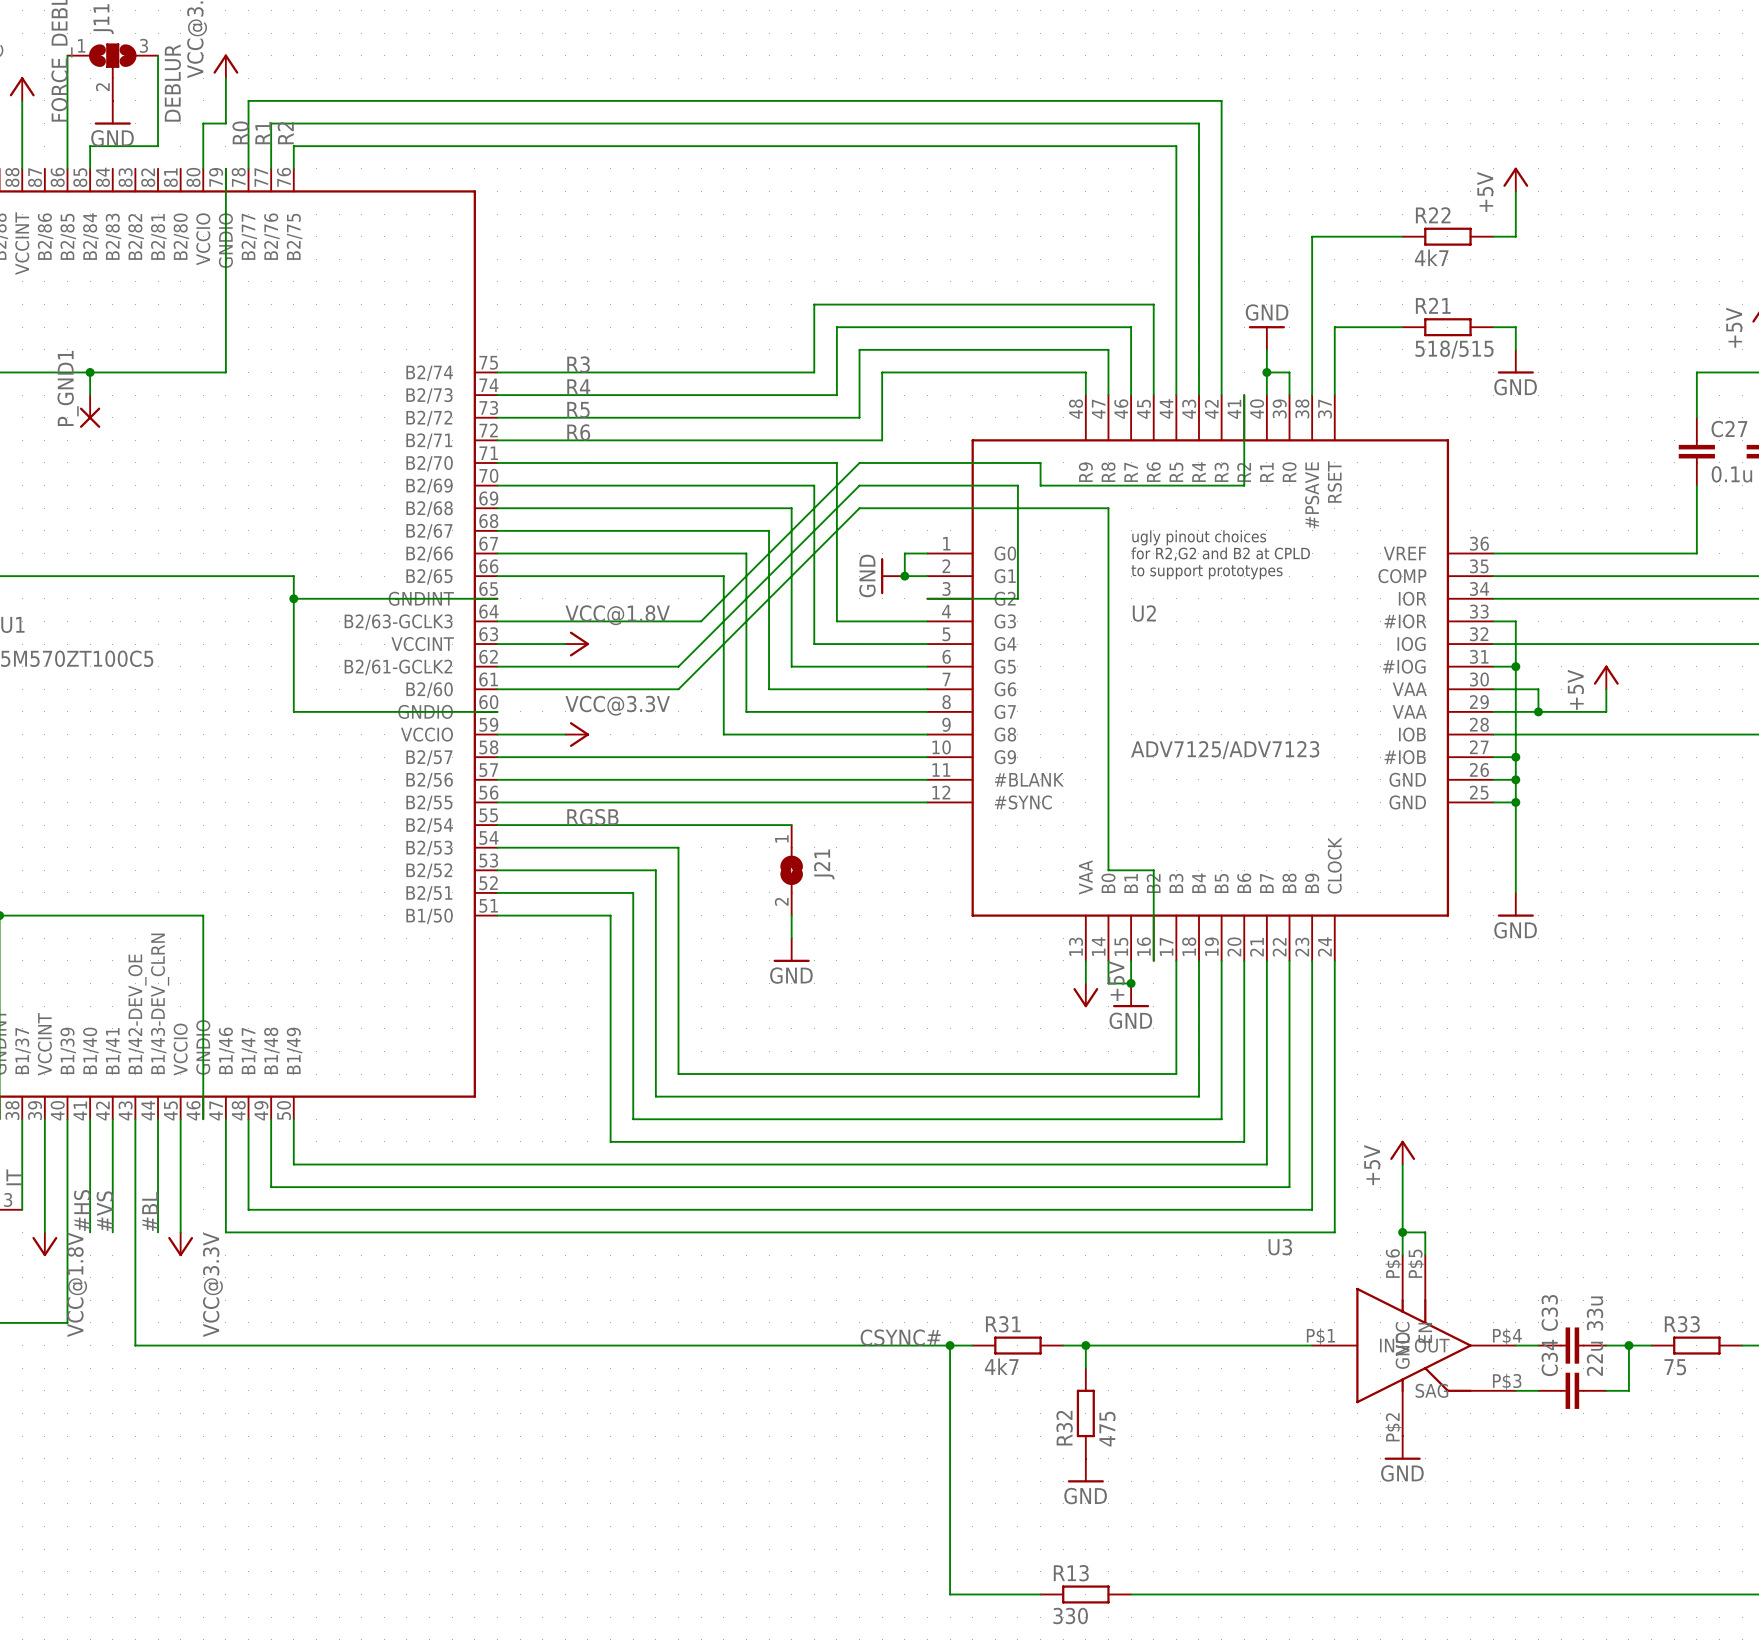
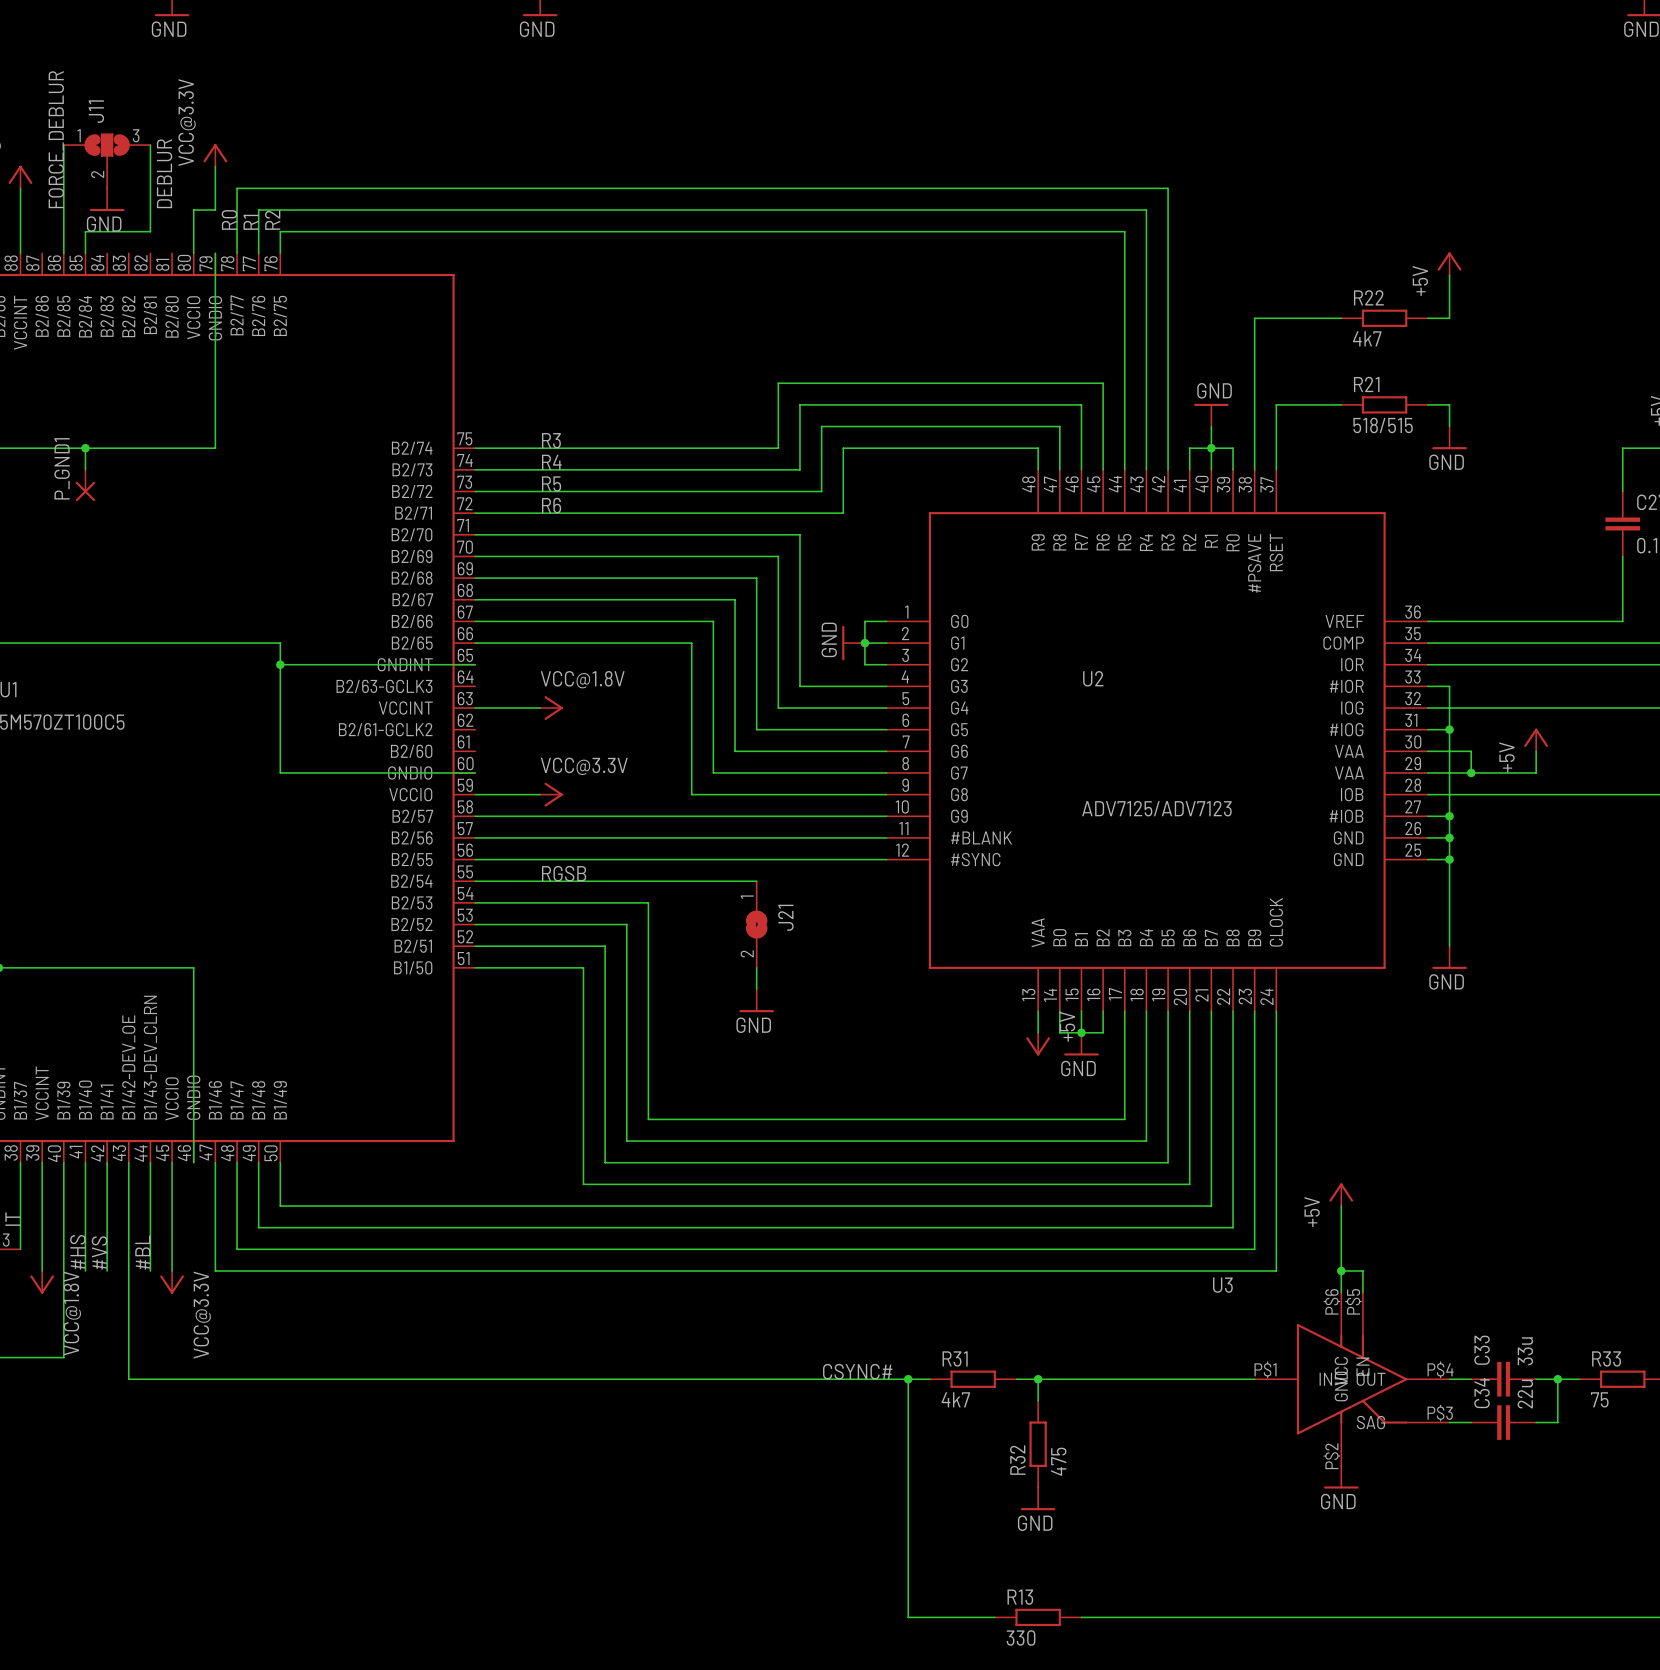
wire: (1244, 395) (1244, 485) (1040, 485) (1040, 462) (859, 462) (701, 621) (497, 621) -> (1189, 469) (1189, 448) (1211, 448)
text: ugly pinout choices (1199, 537) -> none
text: for R2,G2 and B2 at CPLD (1220, 554) -> none
text: to support prototypes (1207, 572) -> none
wire: (927, 598) (1017, 598) (1017, 485) (859, 485) (678, 666) (497, 666) -> (886, 664) (864, 664) (864, 643)
wire: (497, 689) (678, 689) (859, 508) (1108, 508) (1108, 870) (1153, 870) (1153, 960) -> (1081, 1032) (1103, 1032) (1103, 1011)

